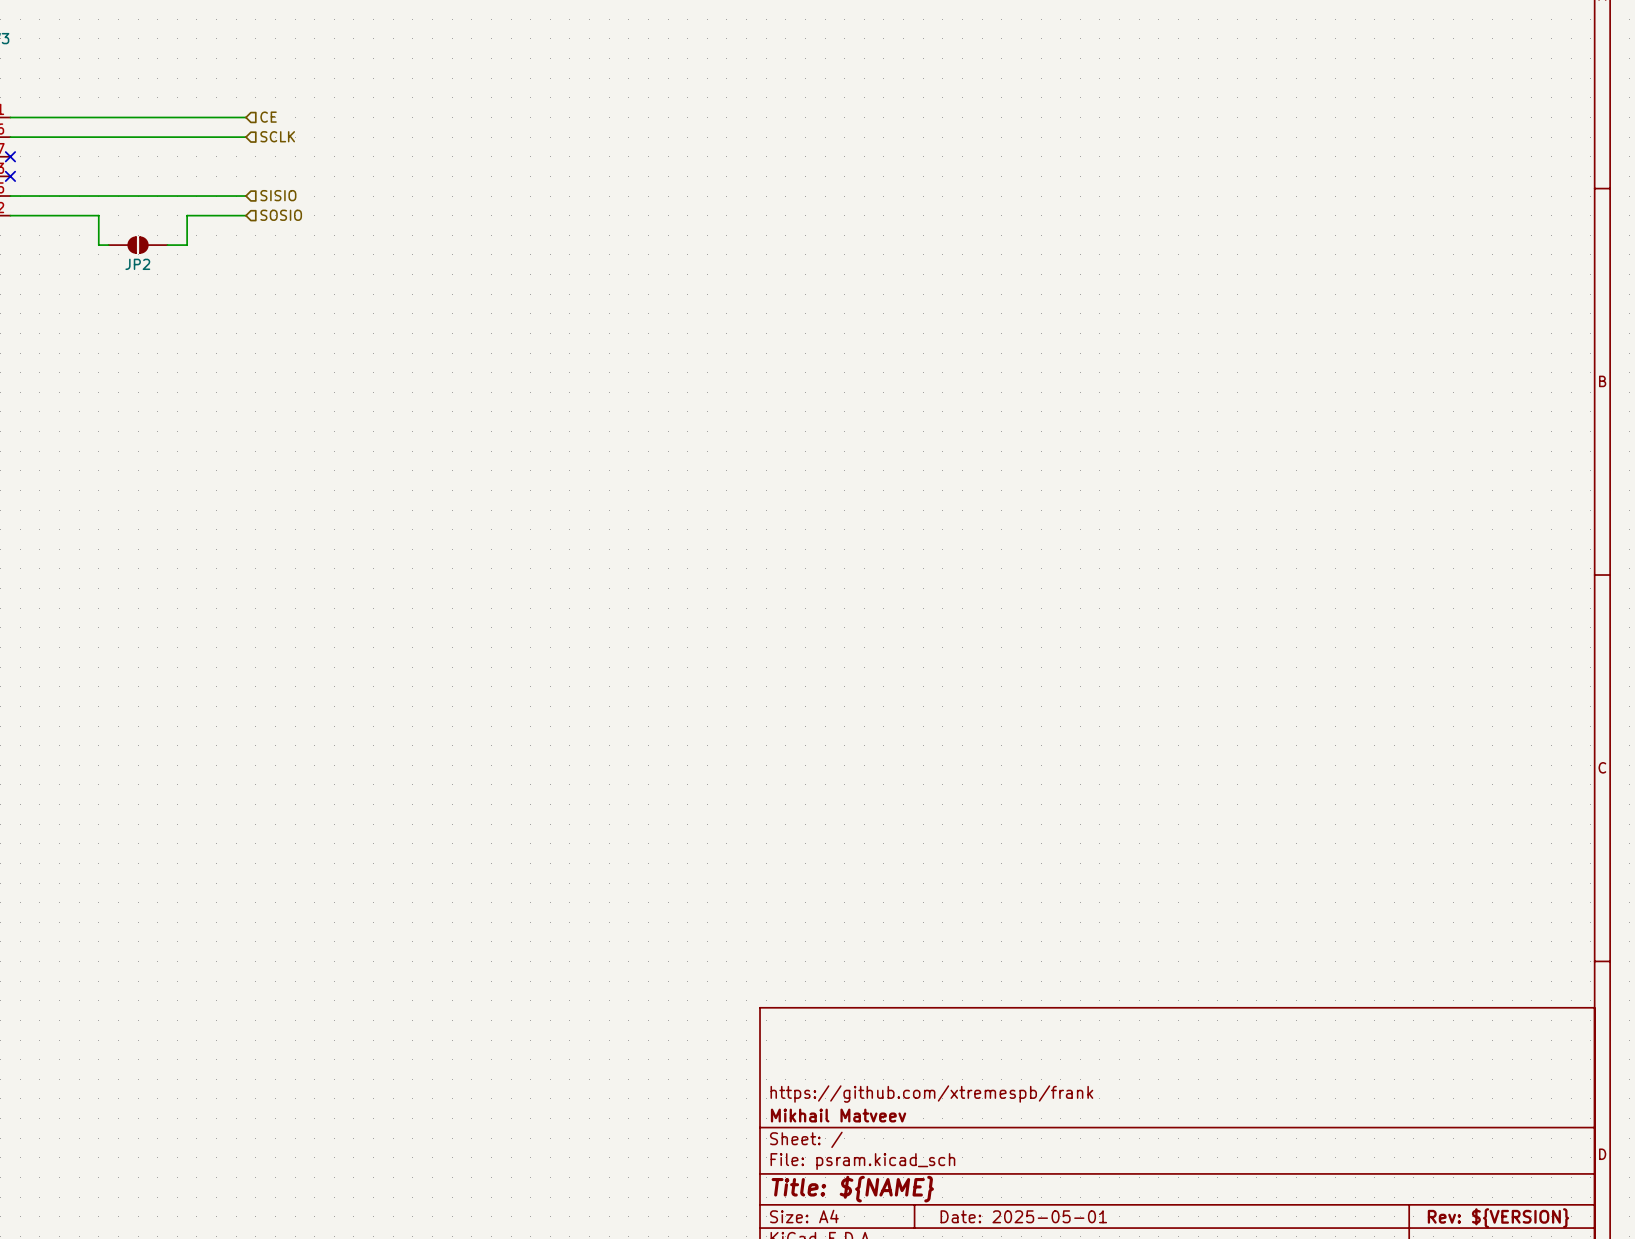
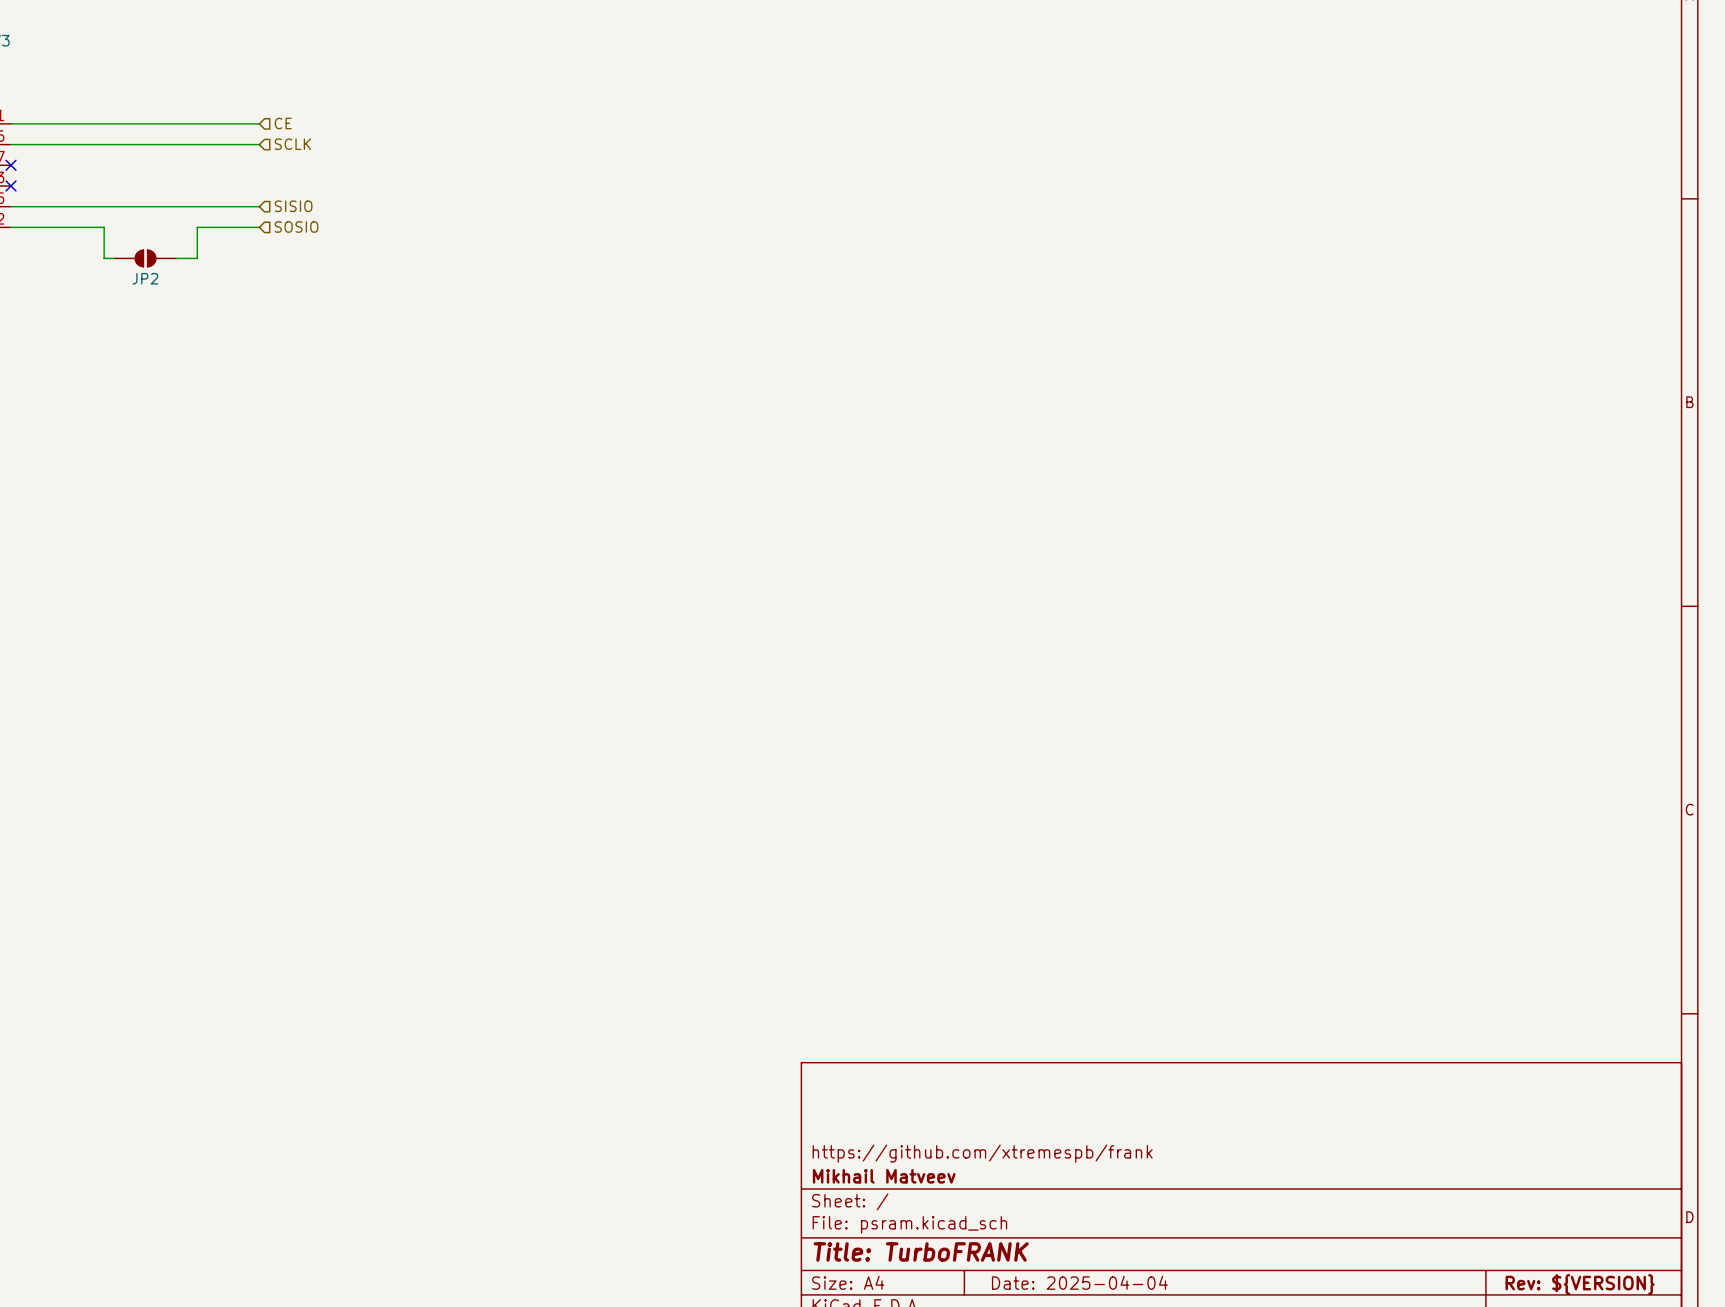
title block: Title: ${NAME} (852, 1189) -> Title: TurboFRANK (921, 1251)
title block: Date: 2025-05-01 (1023, 1216) -> Date: 2025-04-04 (1079, 1282)

